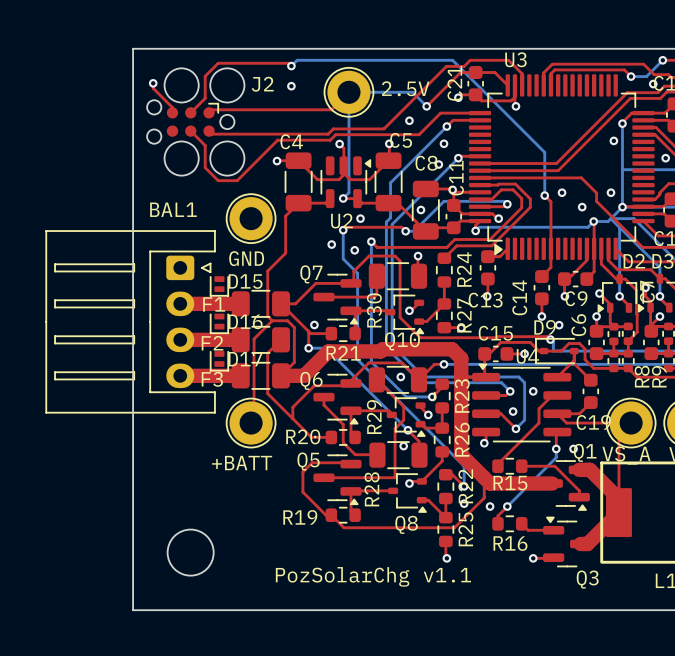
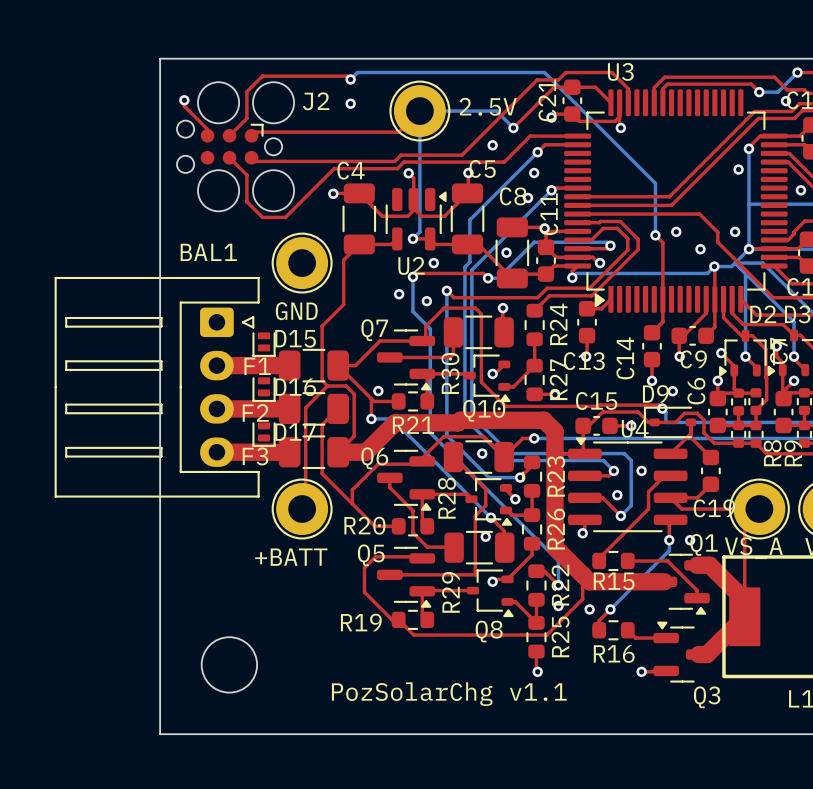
R29 name: R29 (374, 417) -> R28 (446, 498)
R28 name: R28 (372, 489) -> R29 (450, 592)

